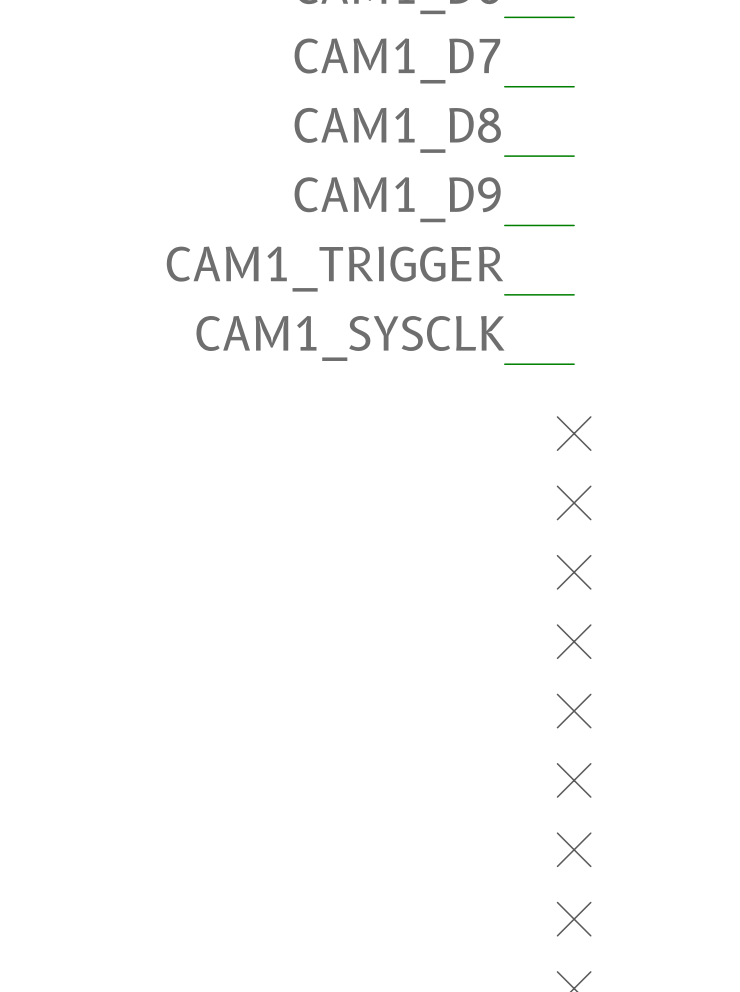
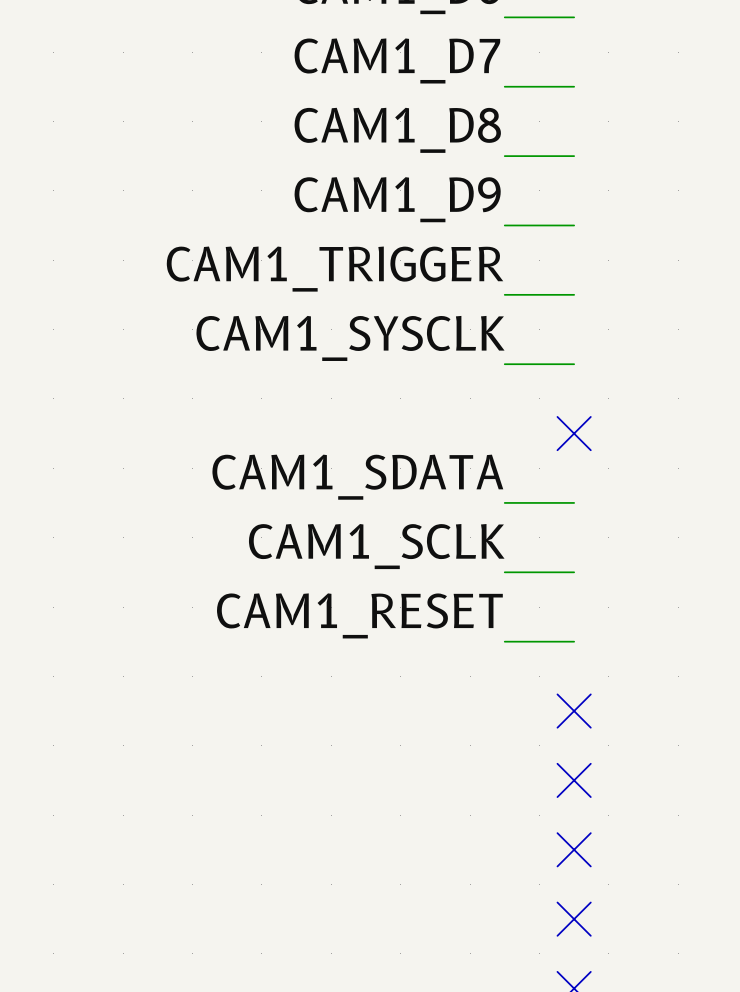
label: none -> CAM1_SDATA (357, 477)
wire: none -> (504, 502) (574, 502)
no-connect mark: (574, 502) -> none
label: none -> CAM1_SCLK (376, 546)
wire: none -> (504, 572) (574, 572)
no-connect mark: (574, 572) -> none
label: none -> CAM1_RESET (359, 615)
wire: none -> (504, 641) (574, 641)
no-connect mark: (574, 641) -> none

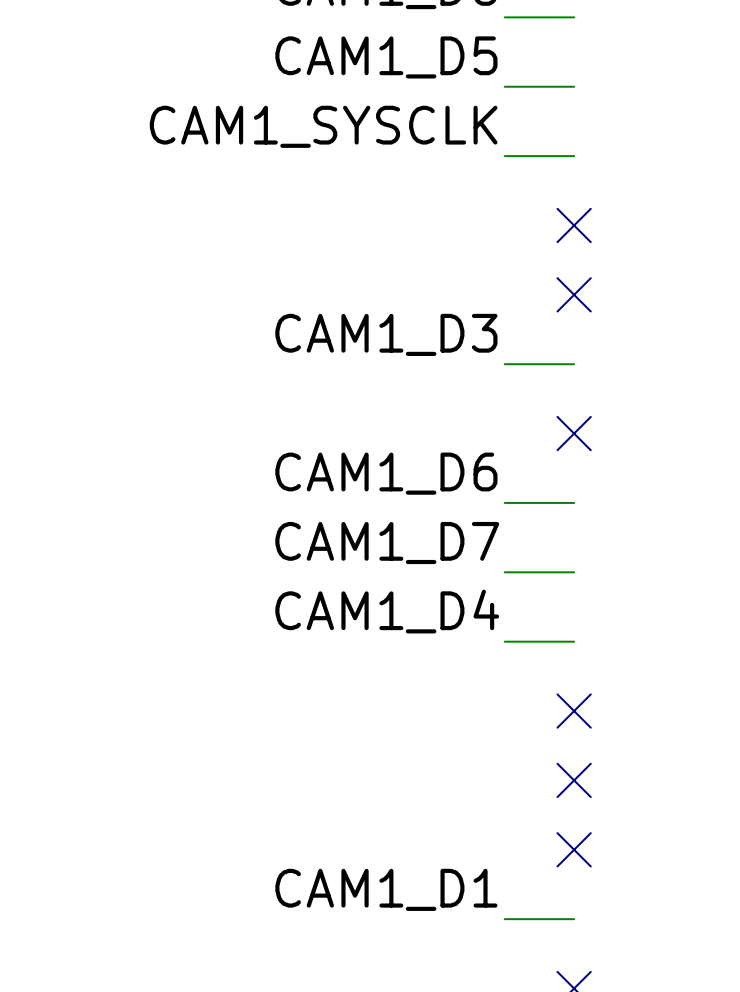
label: CAM1_D7 (397, 60) -> CAM1_D5 (386, 57)
label: CAM1_D8 (397, 130) -> CAM1_SYSCLK (323, 126)
label: CAM1_D9 (397, 199) -> none
wire: (504, 225) (574, 225) -> none
no-connect mark: none -> (574, 225)
label: CAM1_TRIGGER (335, 269) -> none
wire: (504, 294) (574, 294) -> (504, 919) (574, 919)
no-connect mark: none -> (574, 294)
label: CAM1_SYSCLK (350, 338) -> CAM1_D3 (386, 334)
label: CAM1_SDATA (357, 477) -> CAM1_D6 (386, 473)
label: CAM1_SCLK (376, 546) -> CAM1_D7 (387, 543)
label: CAM1_RESET (359, 615) -> CAM1_D4 (387, 611)
label: none -> CAM1_D1 (386, 889)
no-connect mark: (574, 919) -> none

